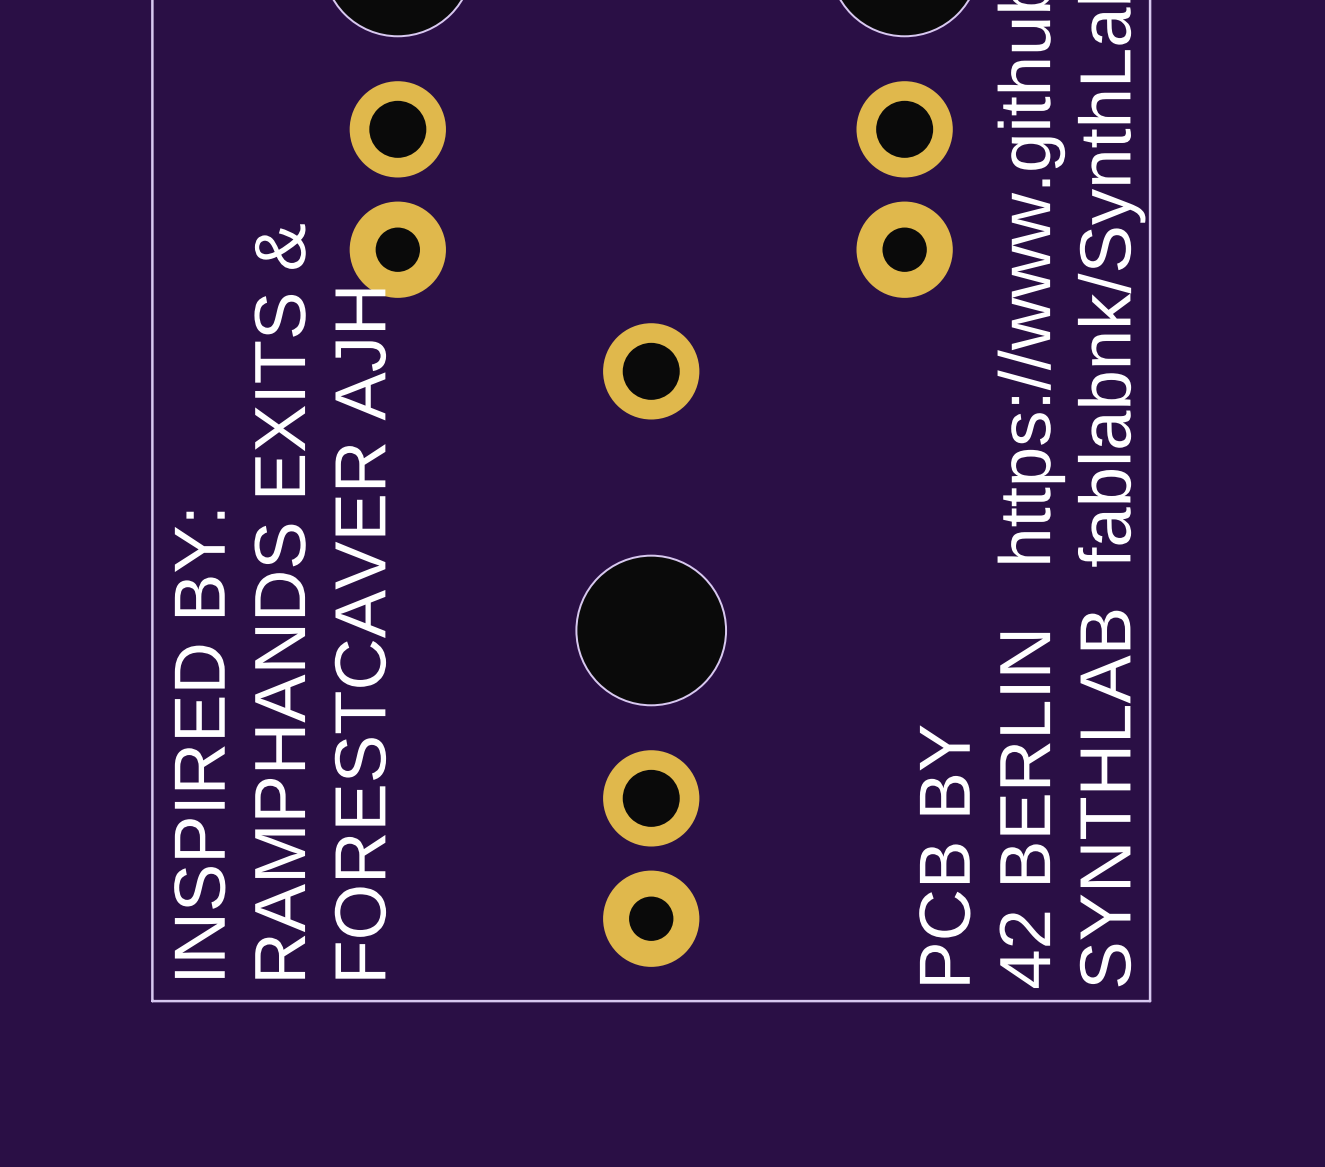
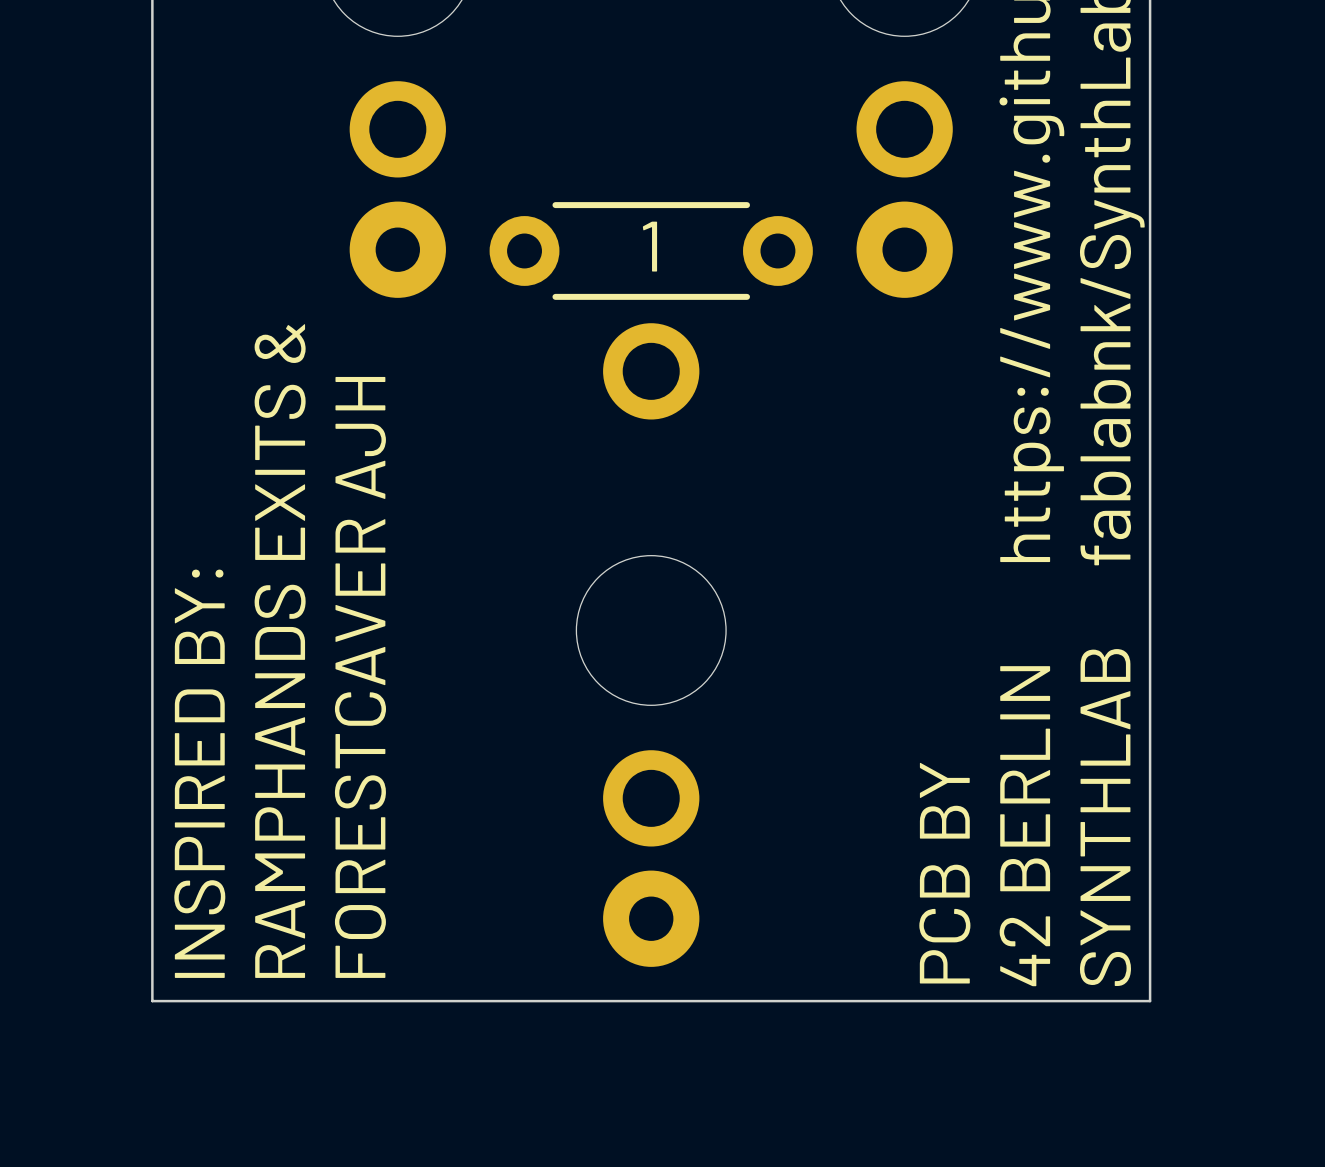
part: none -> 1 (651, 250)

